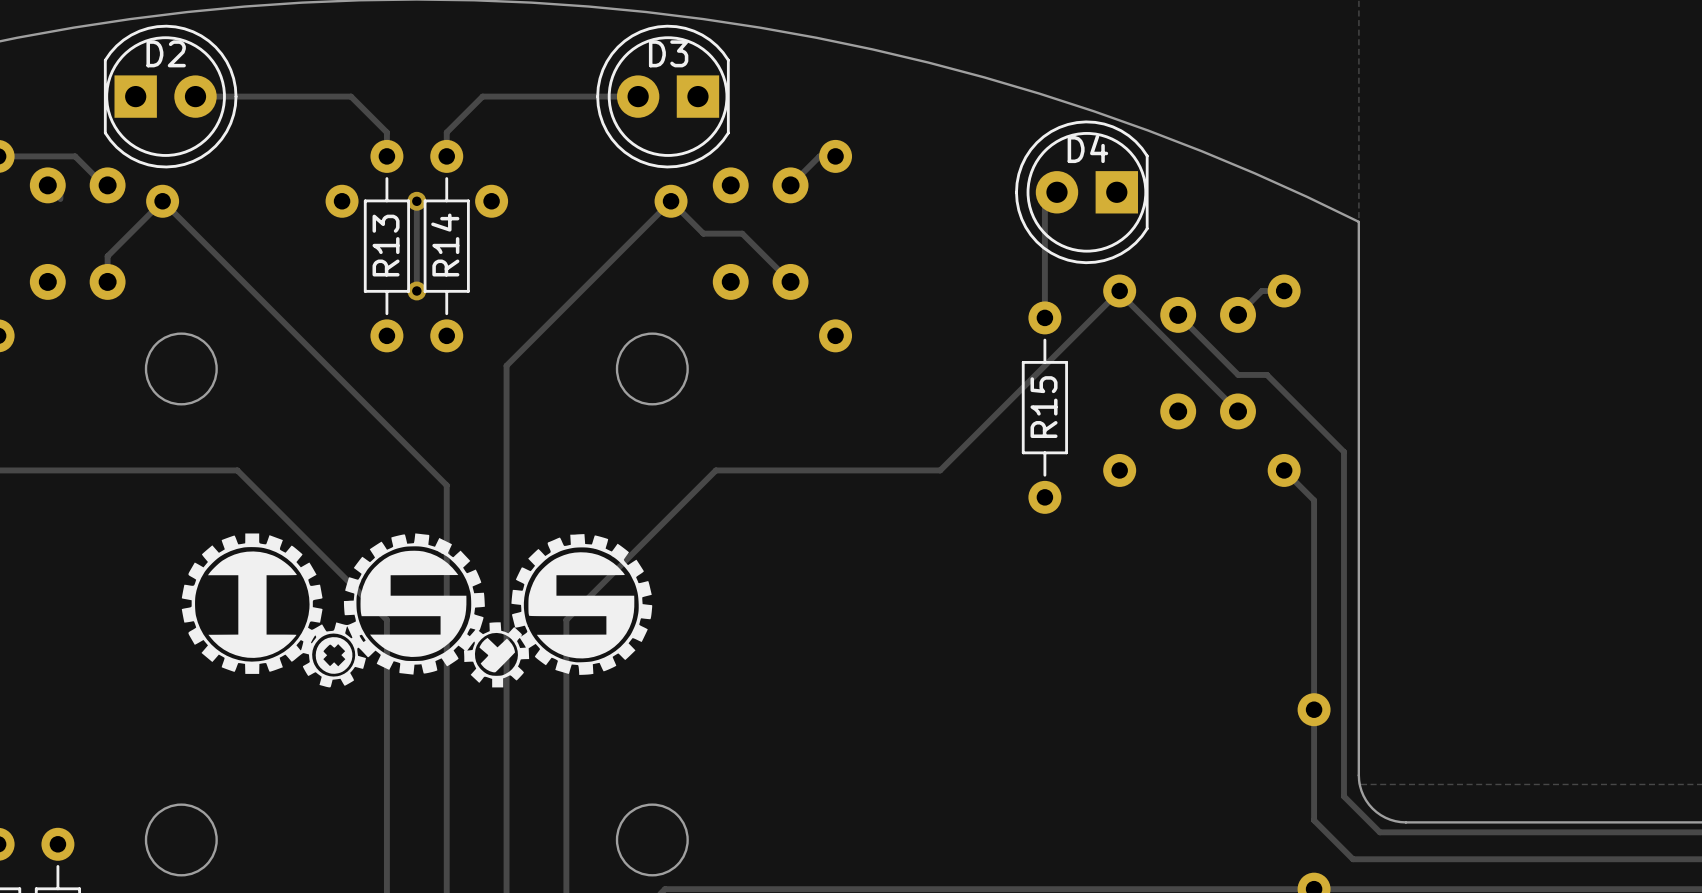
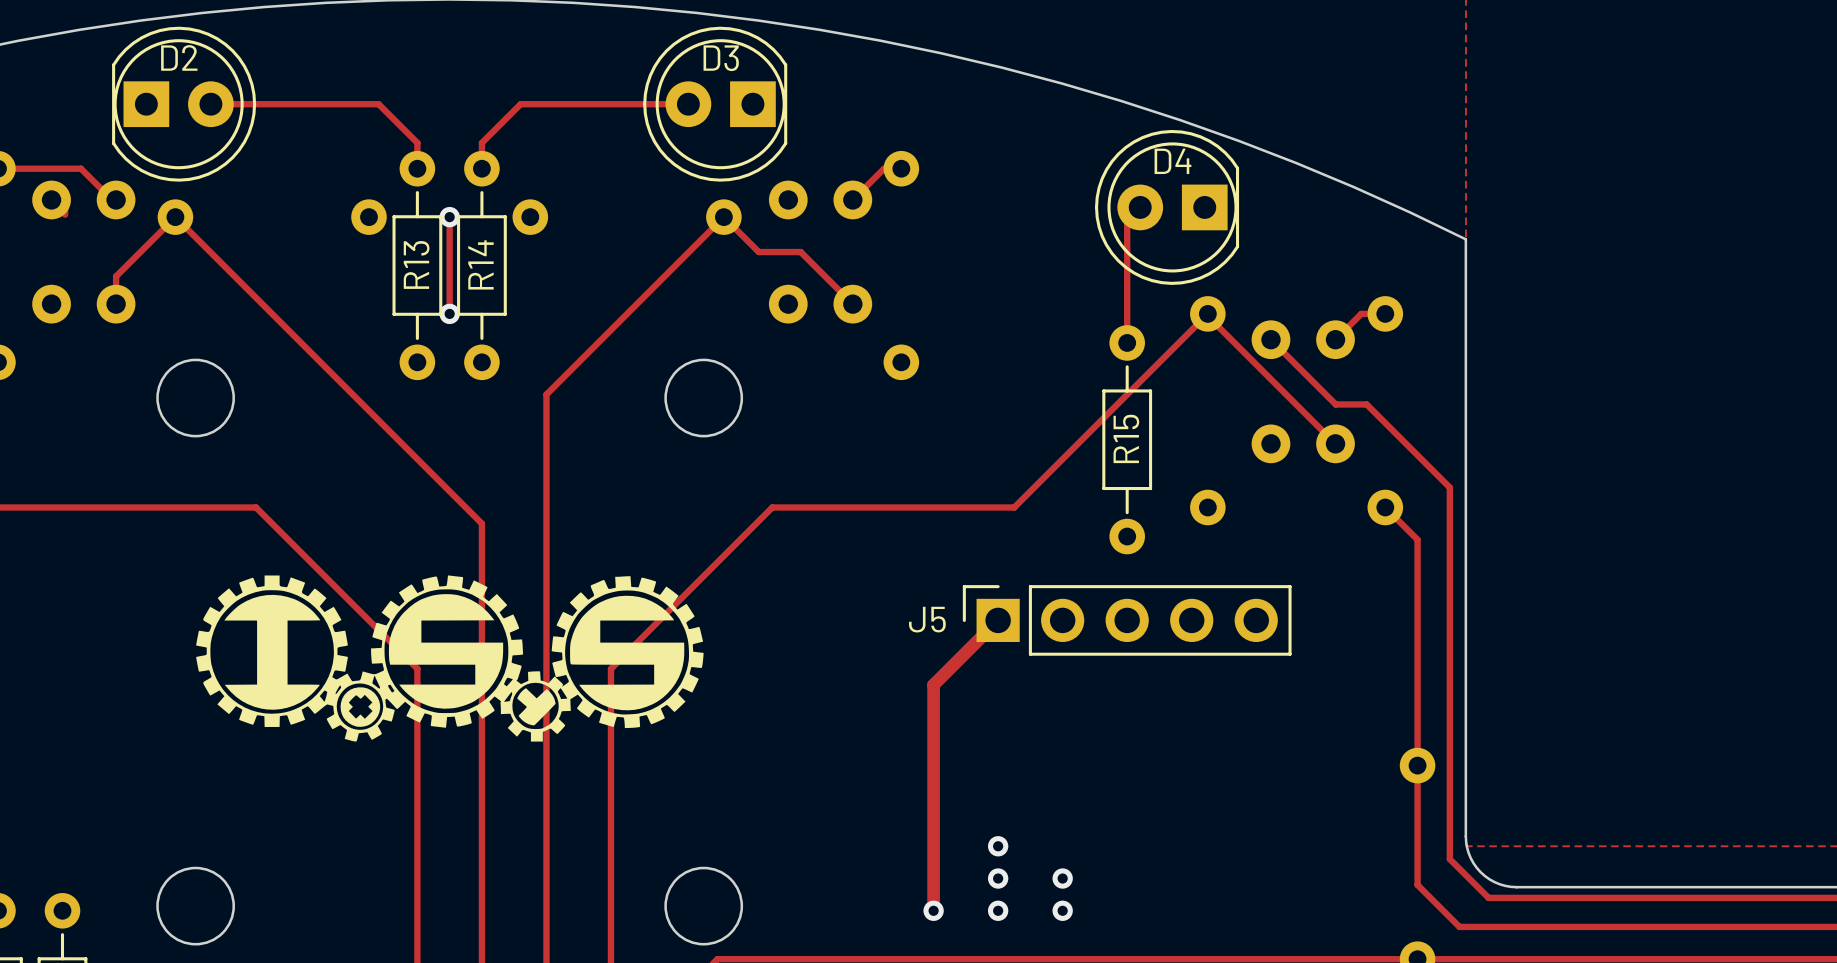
track: none -> (998, 620) (933, 684) (933, 910)
J5: none -> (1127, 620)
via: none -> (998, 846)
via: none -> (998, 878)
via: none -> (1062, 878)
via: none -> (933, 910)
via: none -> (998, 910)
via: none -> (1062, 910)

